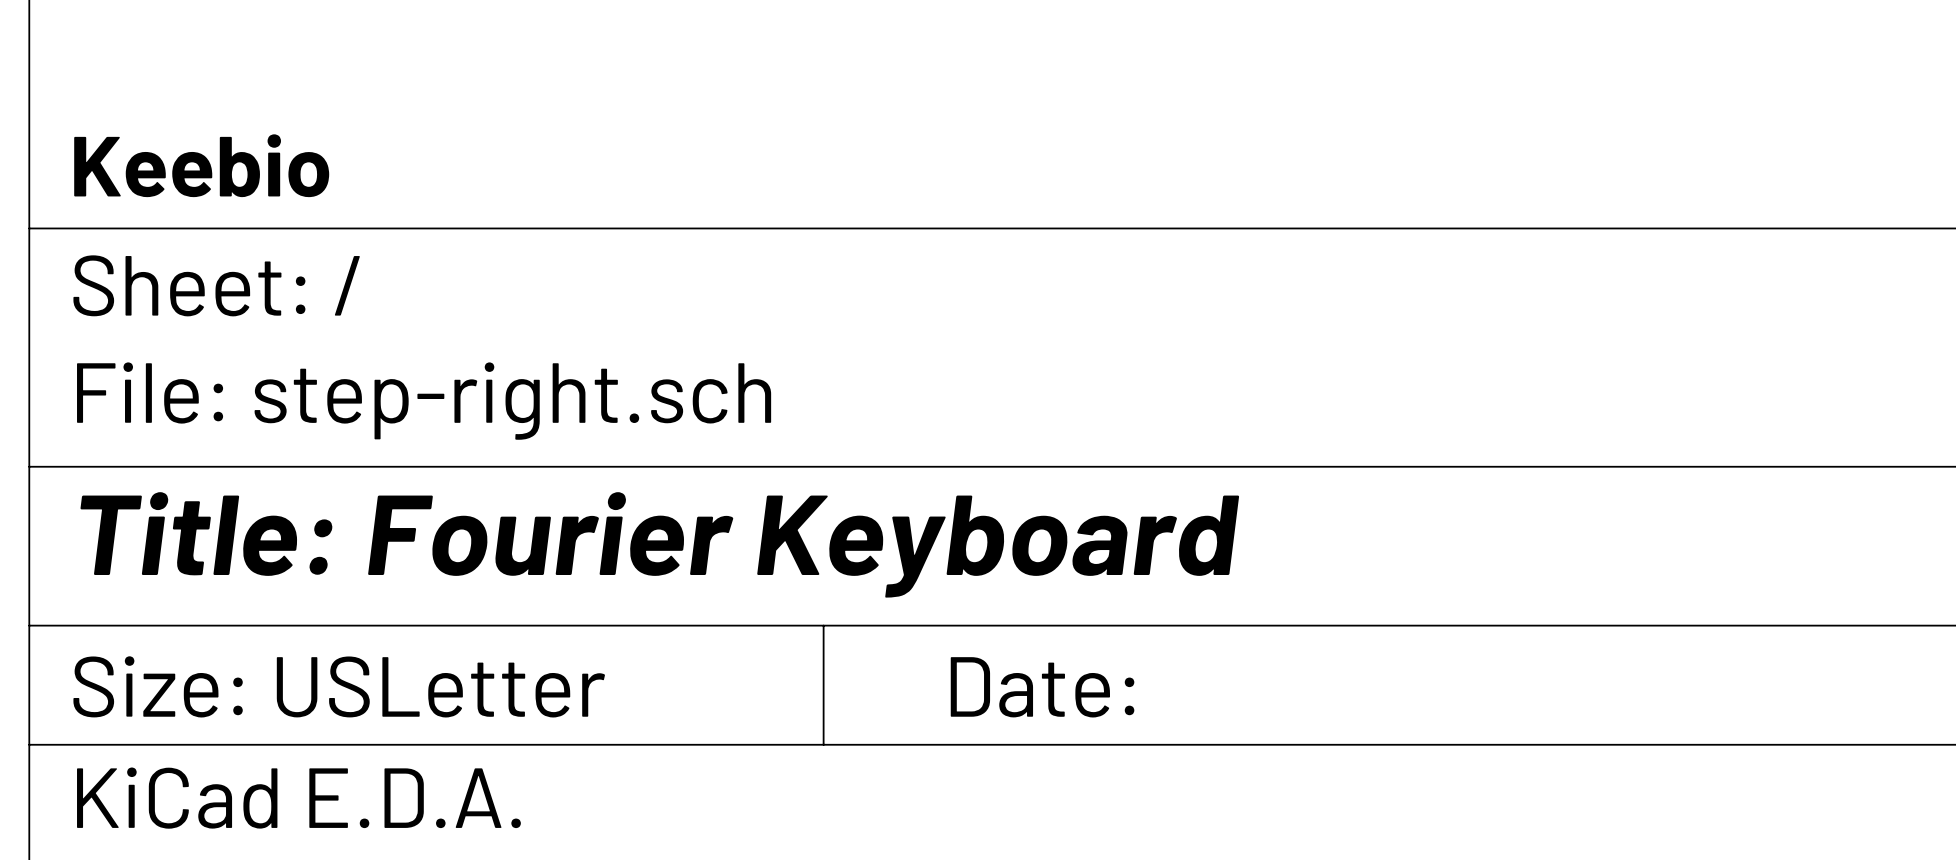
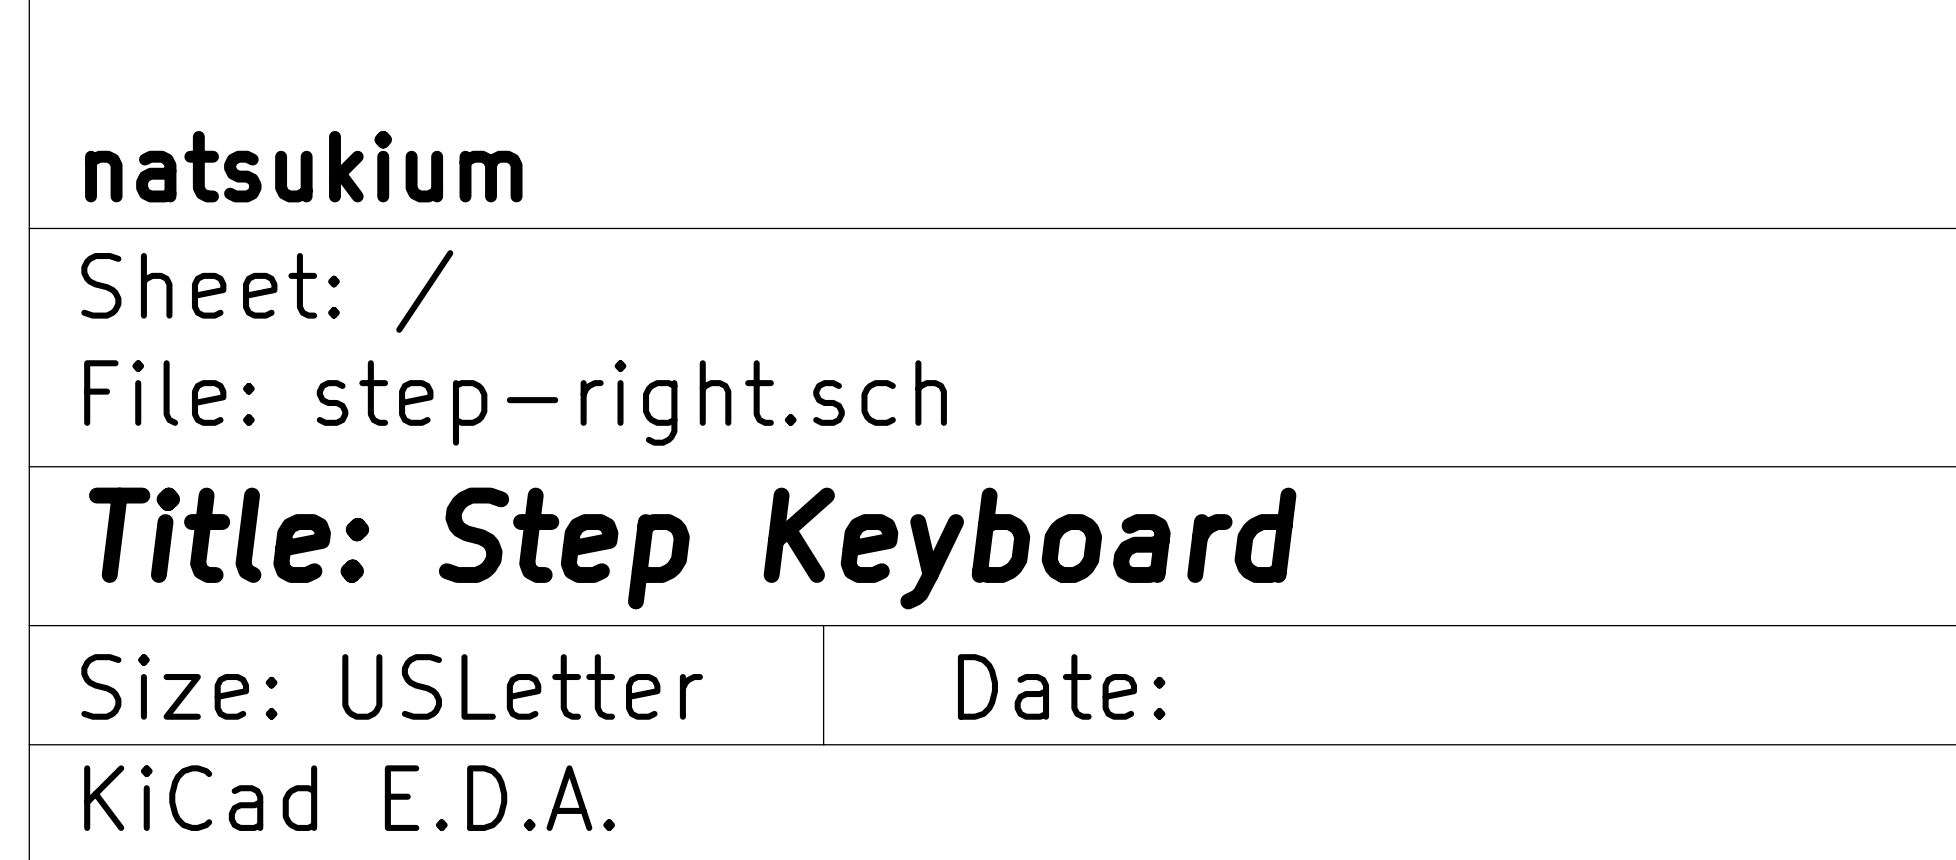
title block: Keebio (201, 165) -> natsukium (303, 166)
title block: Title: Fourier Keyboard (659, 544) -> Title: Step Keyboard (692, 548)

